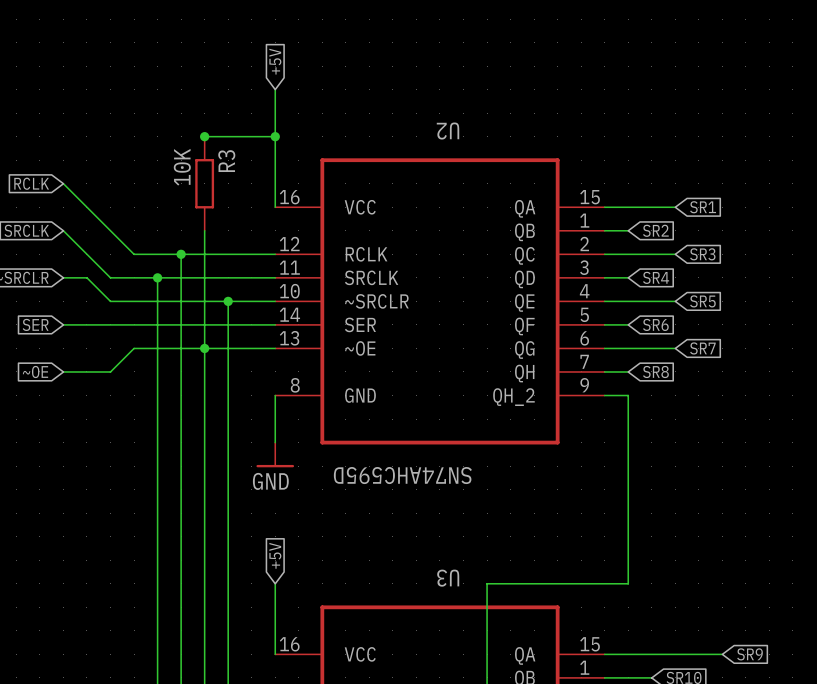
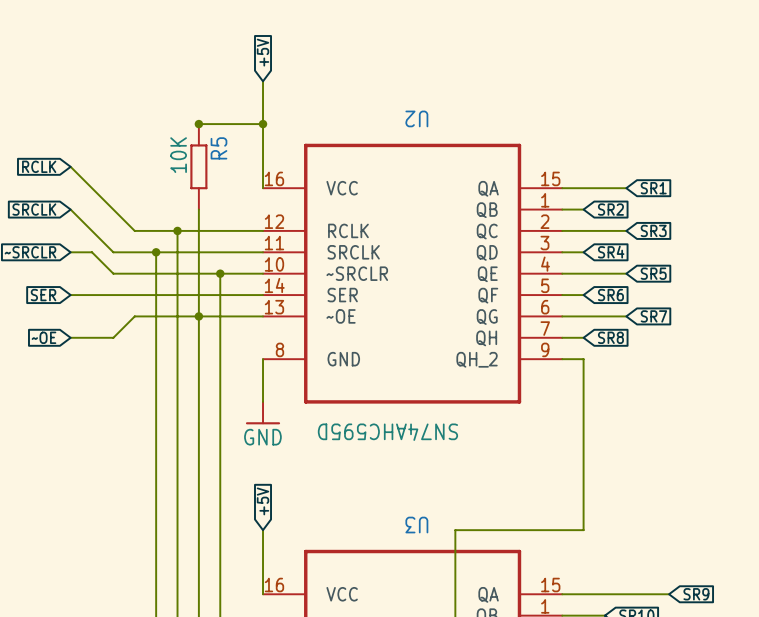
R3 name: R3 (226, 161) -> R5 (218, 148)

